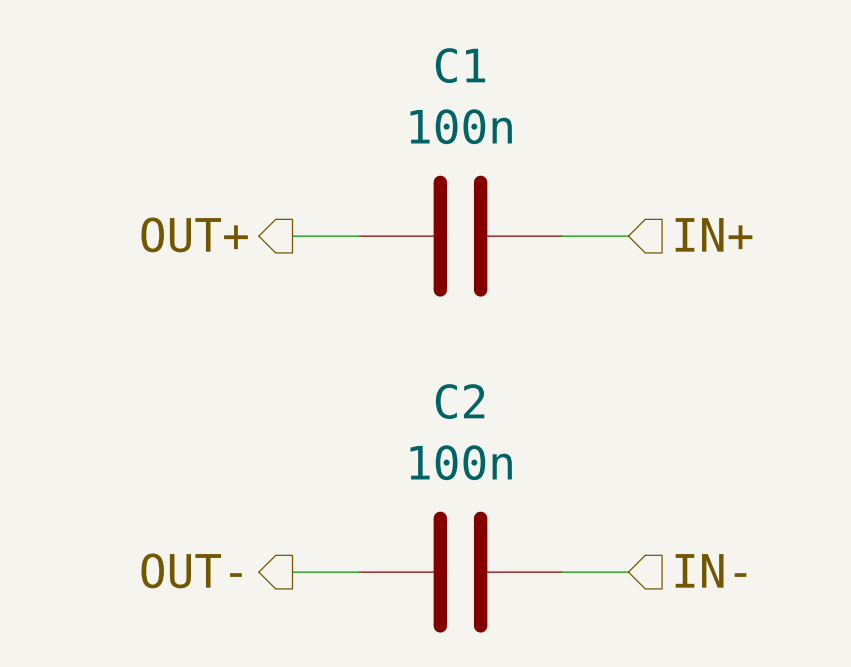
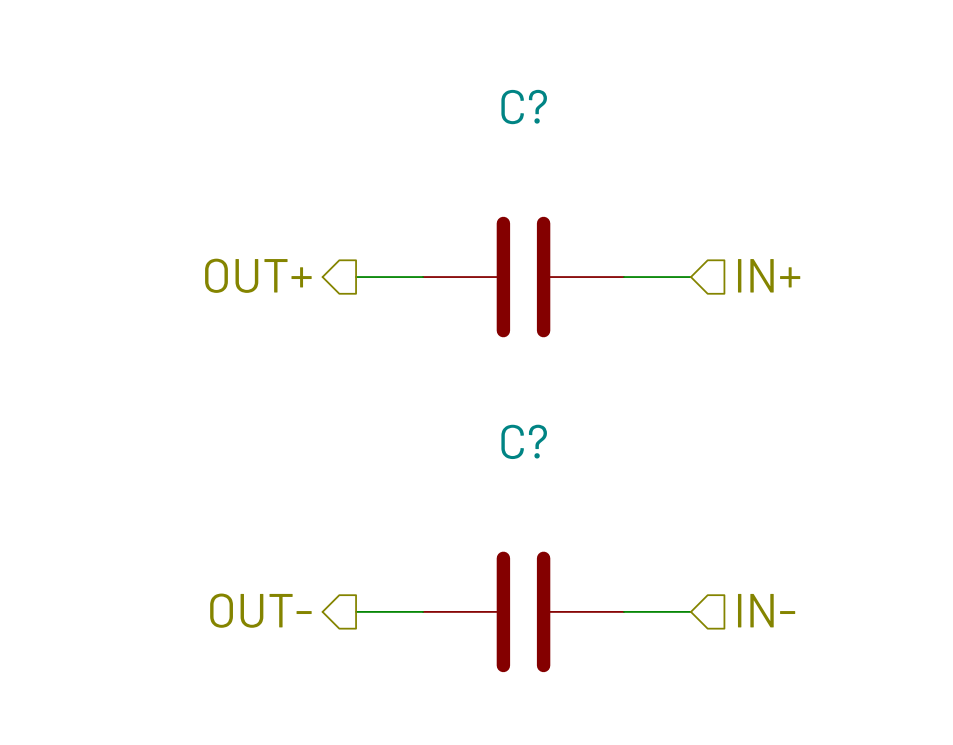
C1 name: C1 (460, 65) -> C? (524, 107)
C1 value: 100n (461, 126) -> none
C2 name: C2 (460, 401) -> C? (524, 441)
C2 value: 100n (461, 462) -> none

